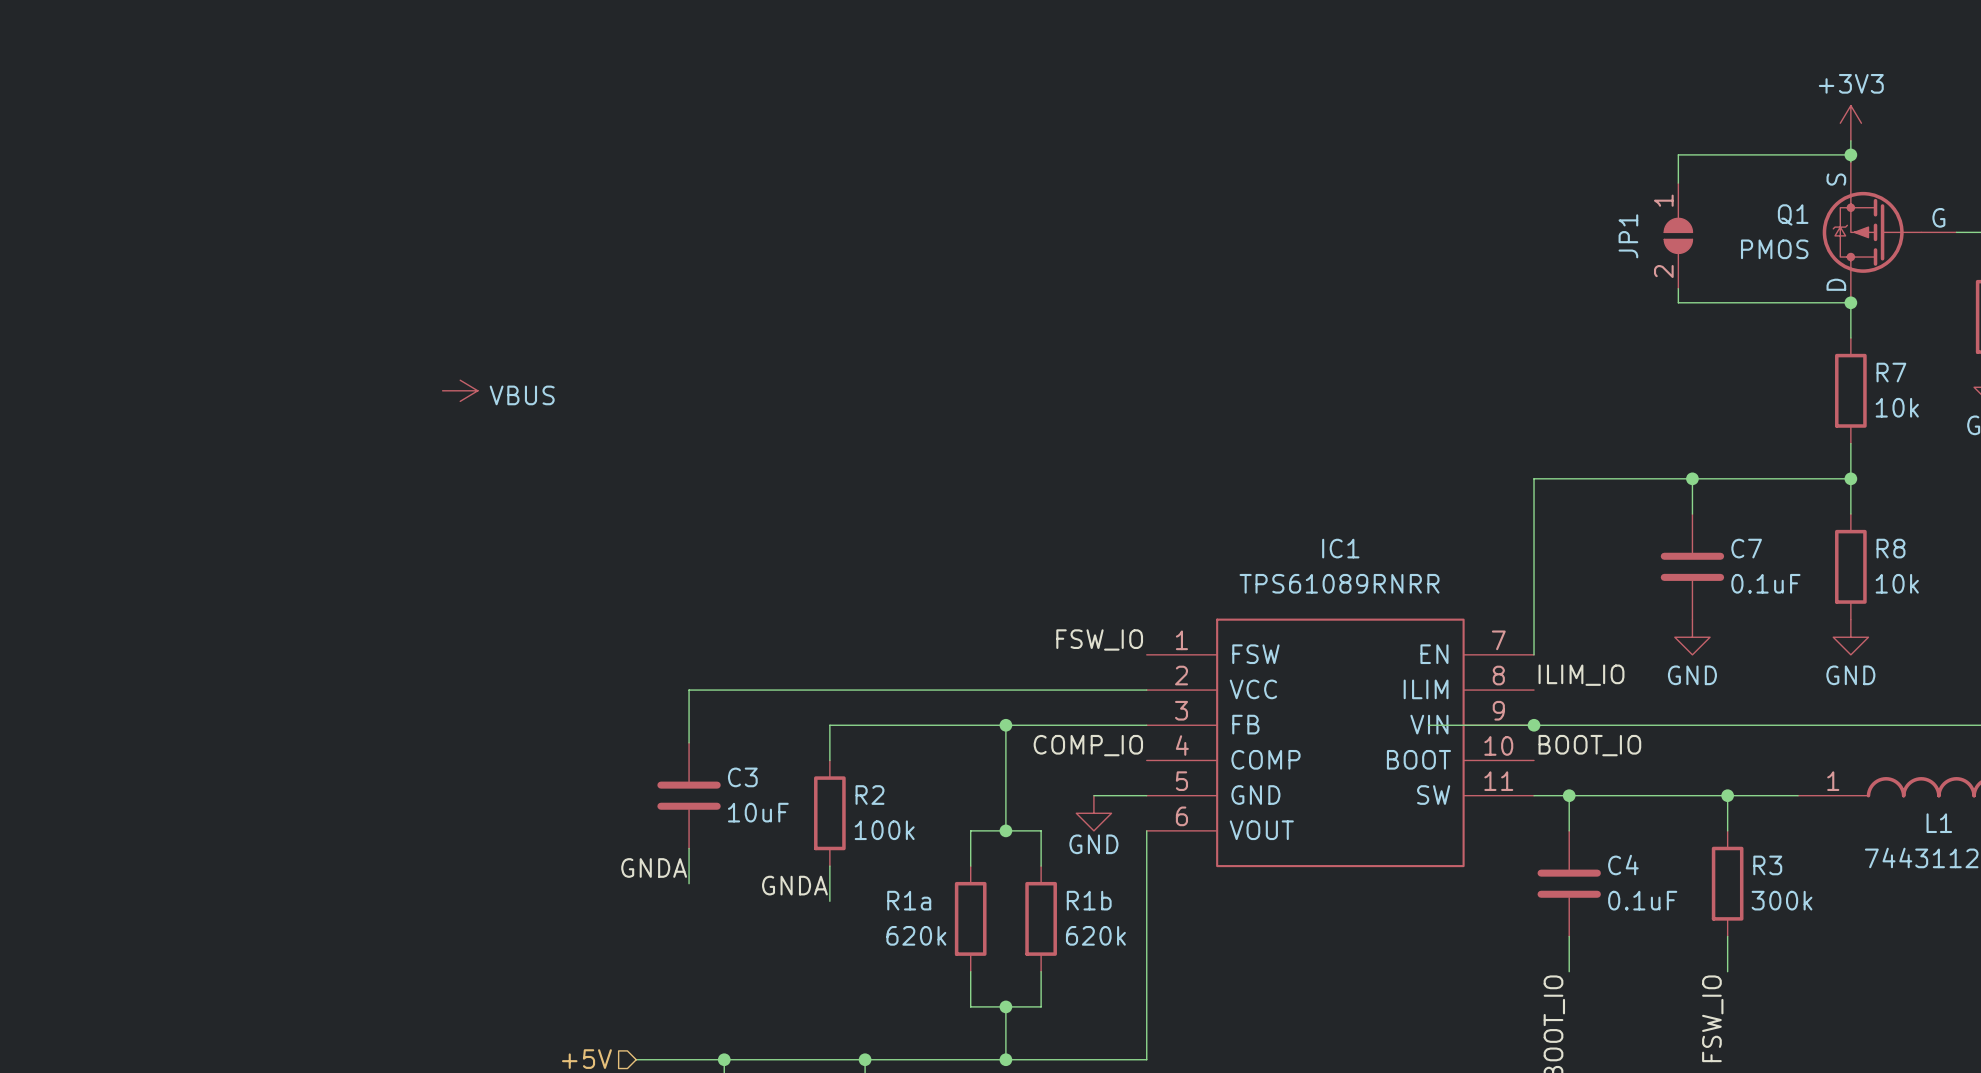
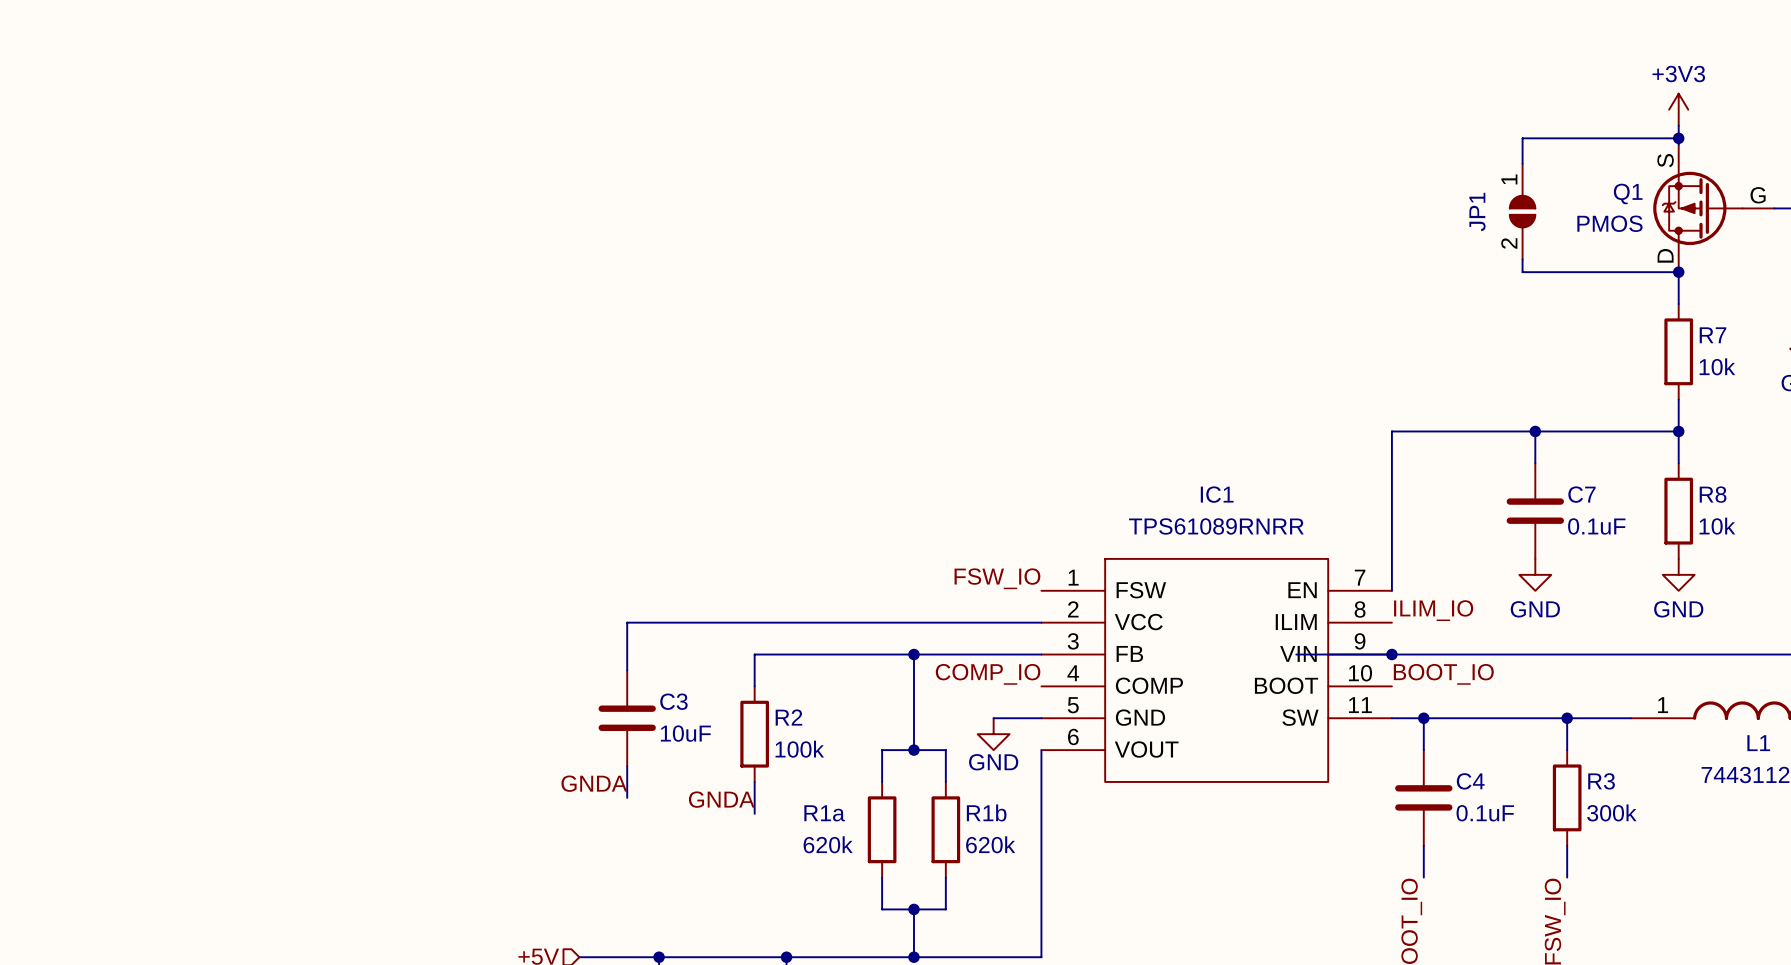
power symbol: VBUS (460, 390) -> none

